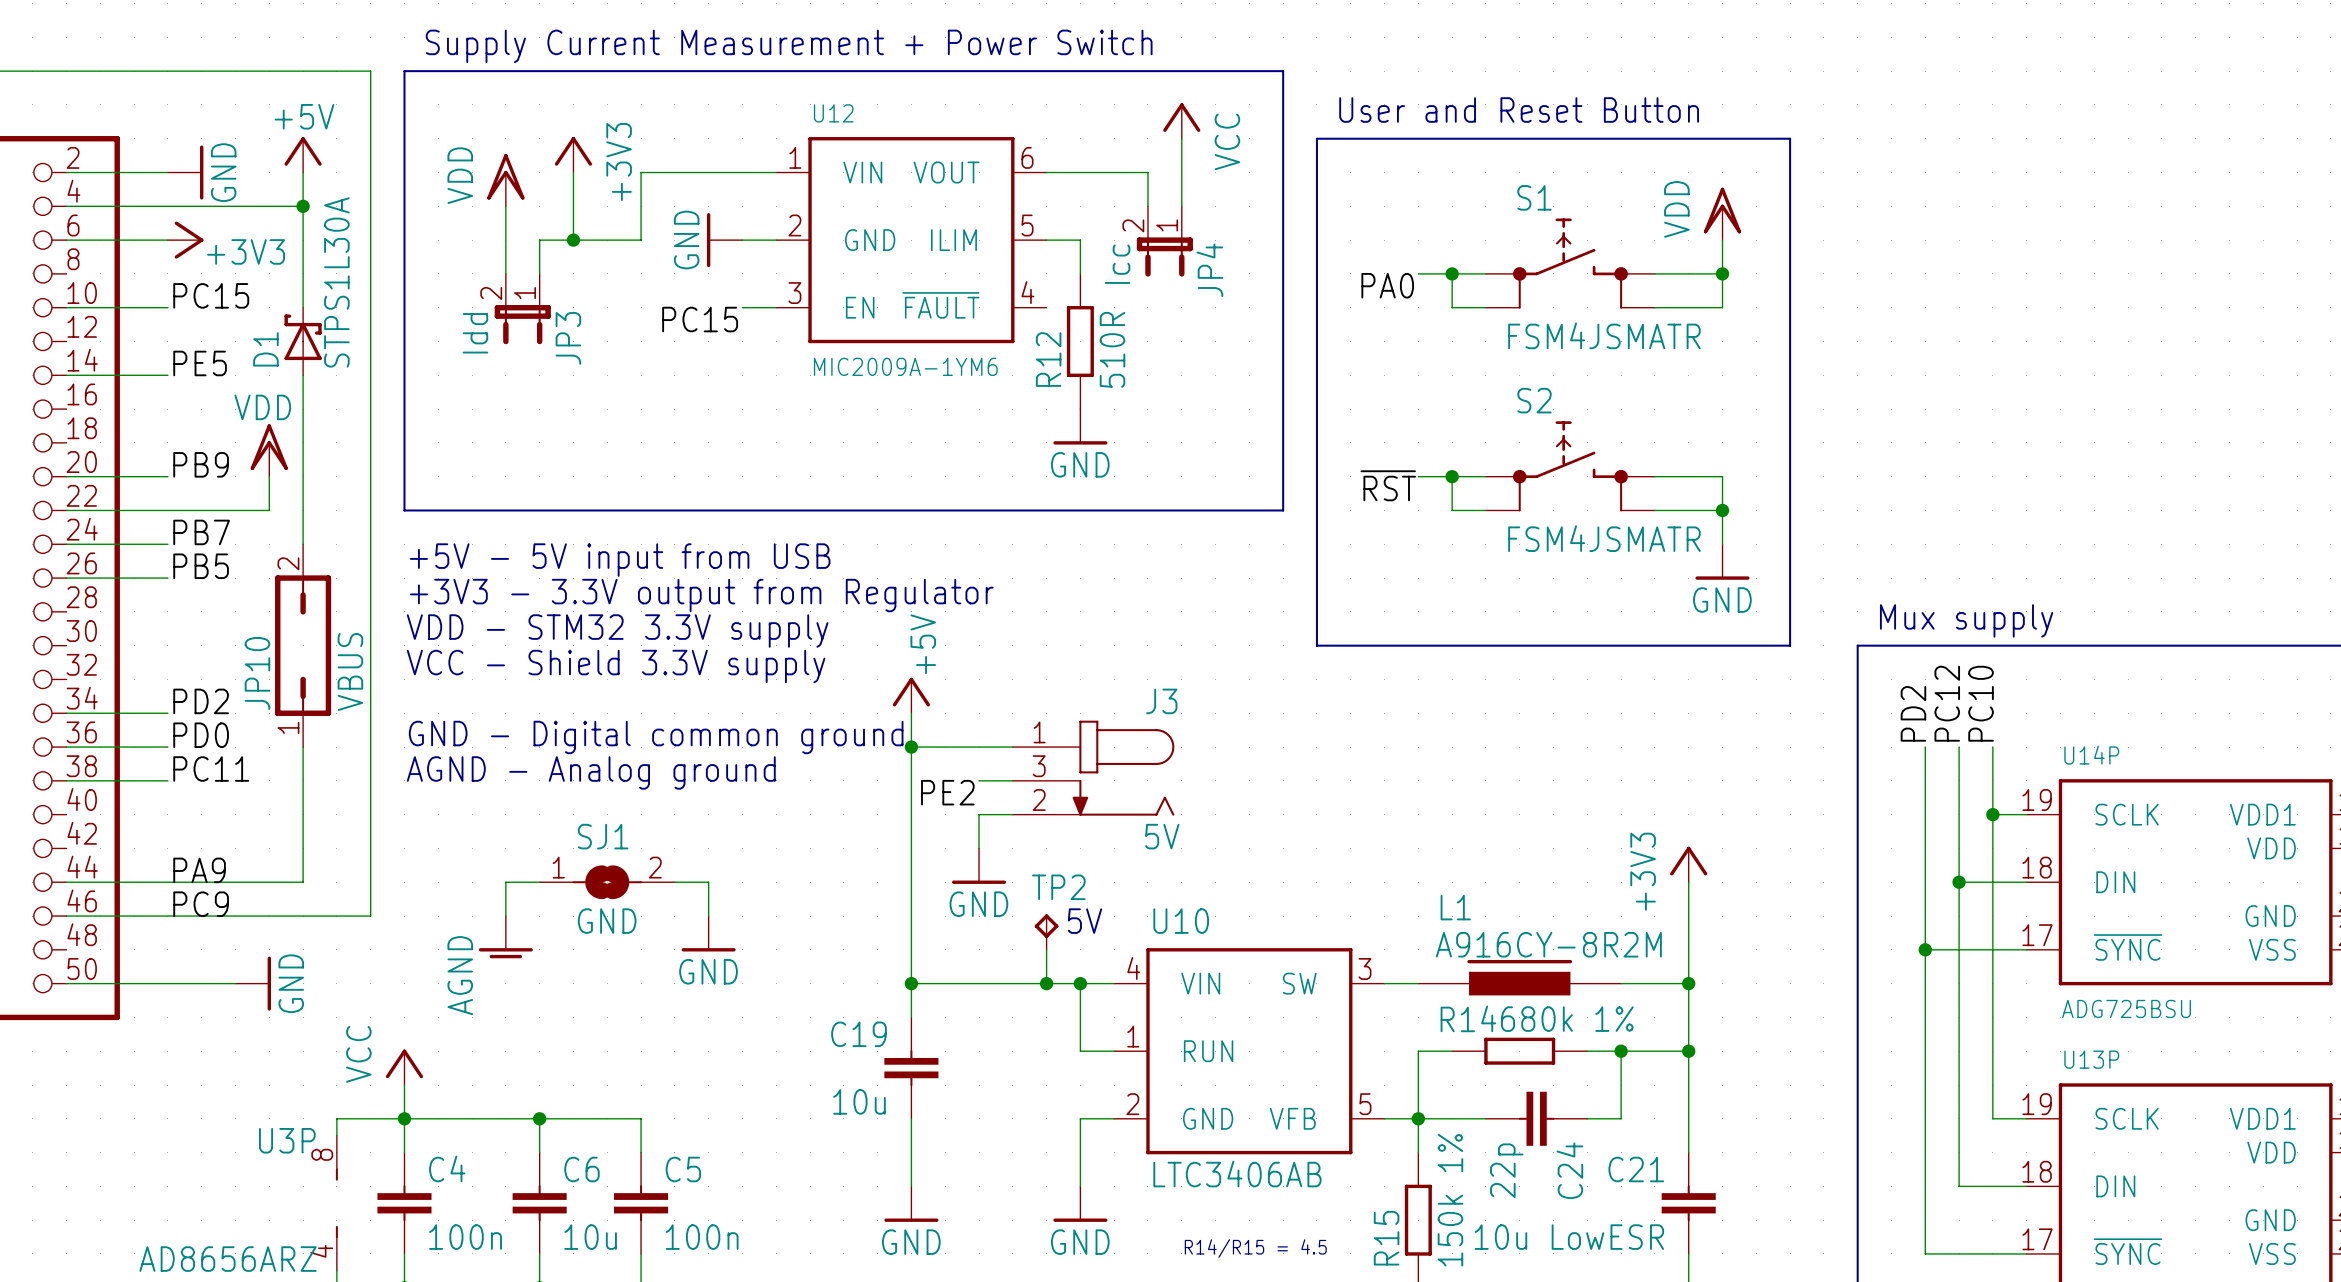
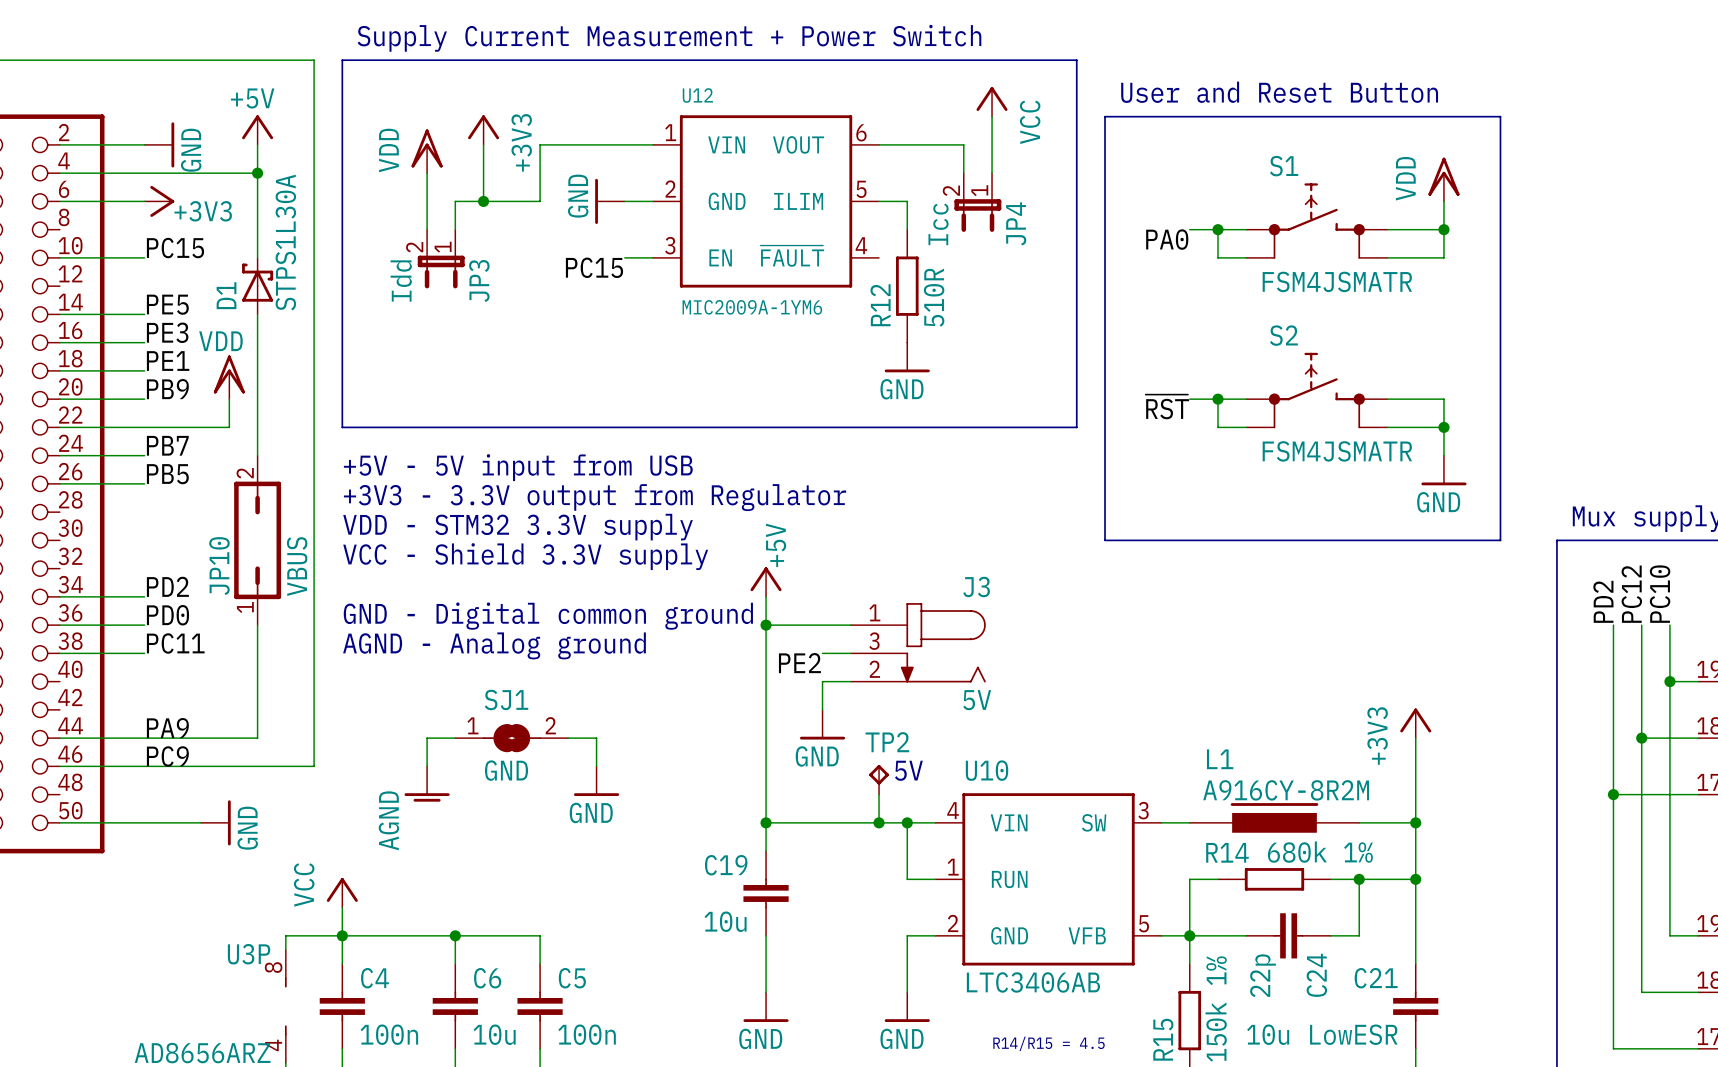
label: none -> PE3 (167, 332)
wire: none -> (59, 342) (144, 342)
label: none -> PE1 (168, 361)
wire: none -> (59, 370) (144, 370)

